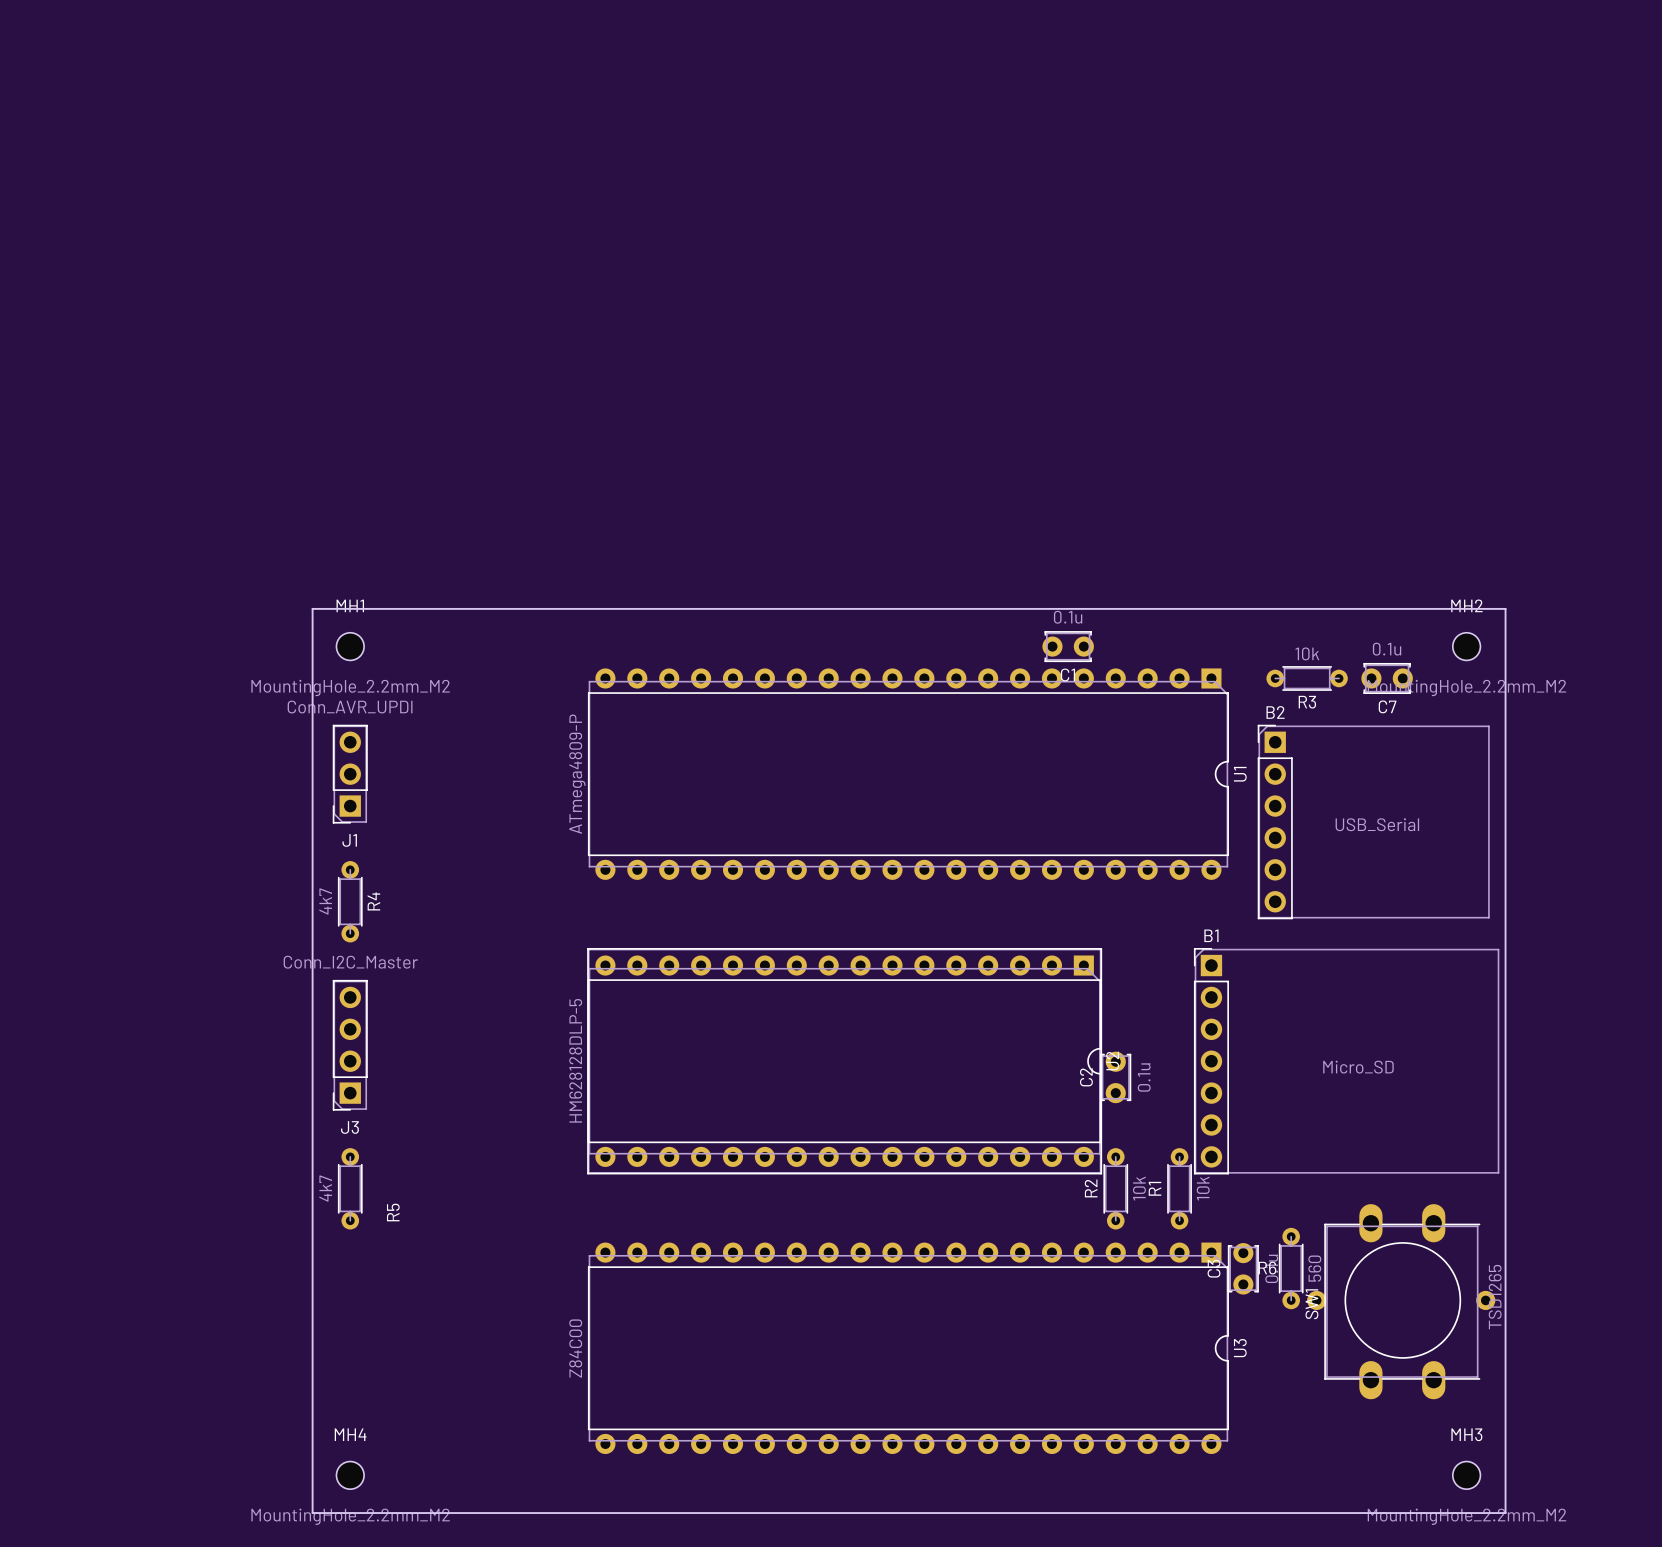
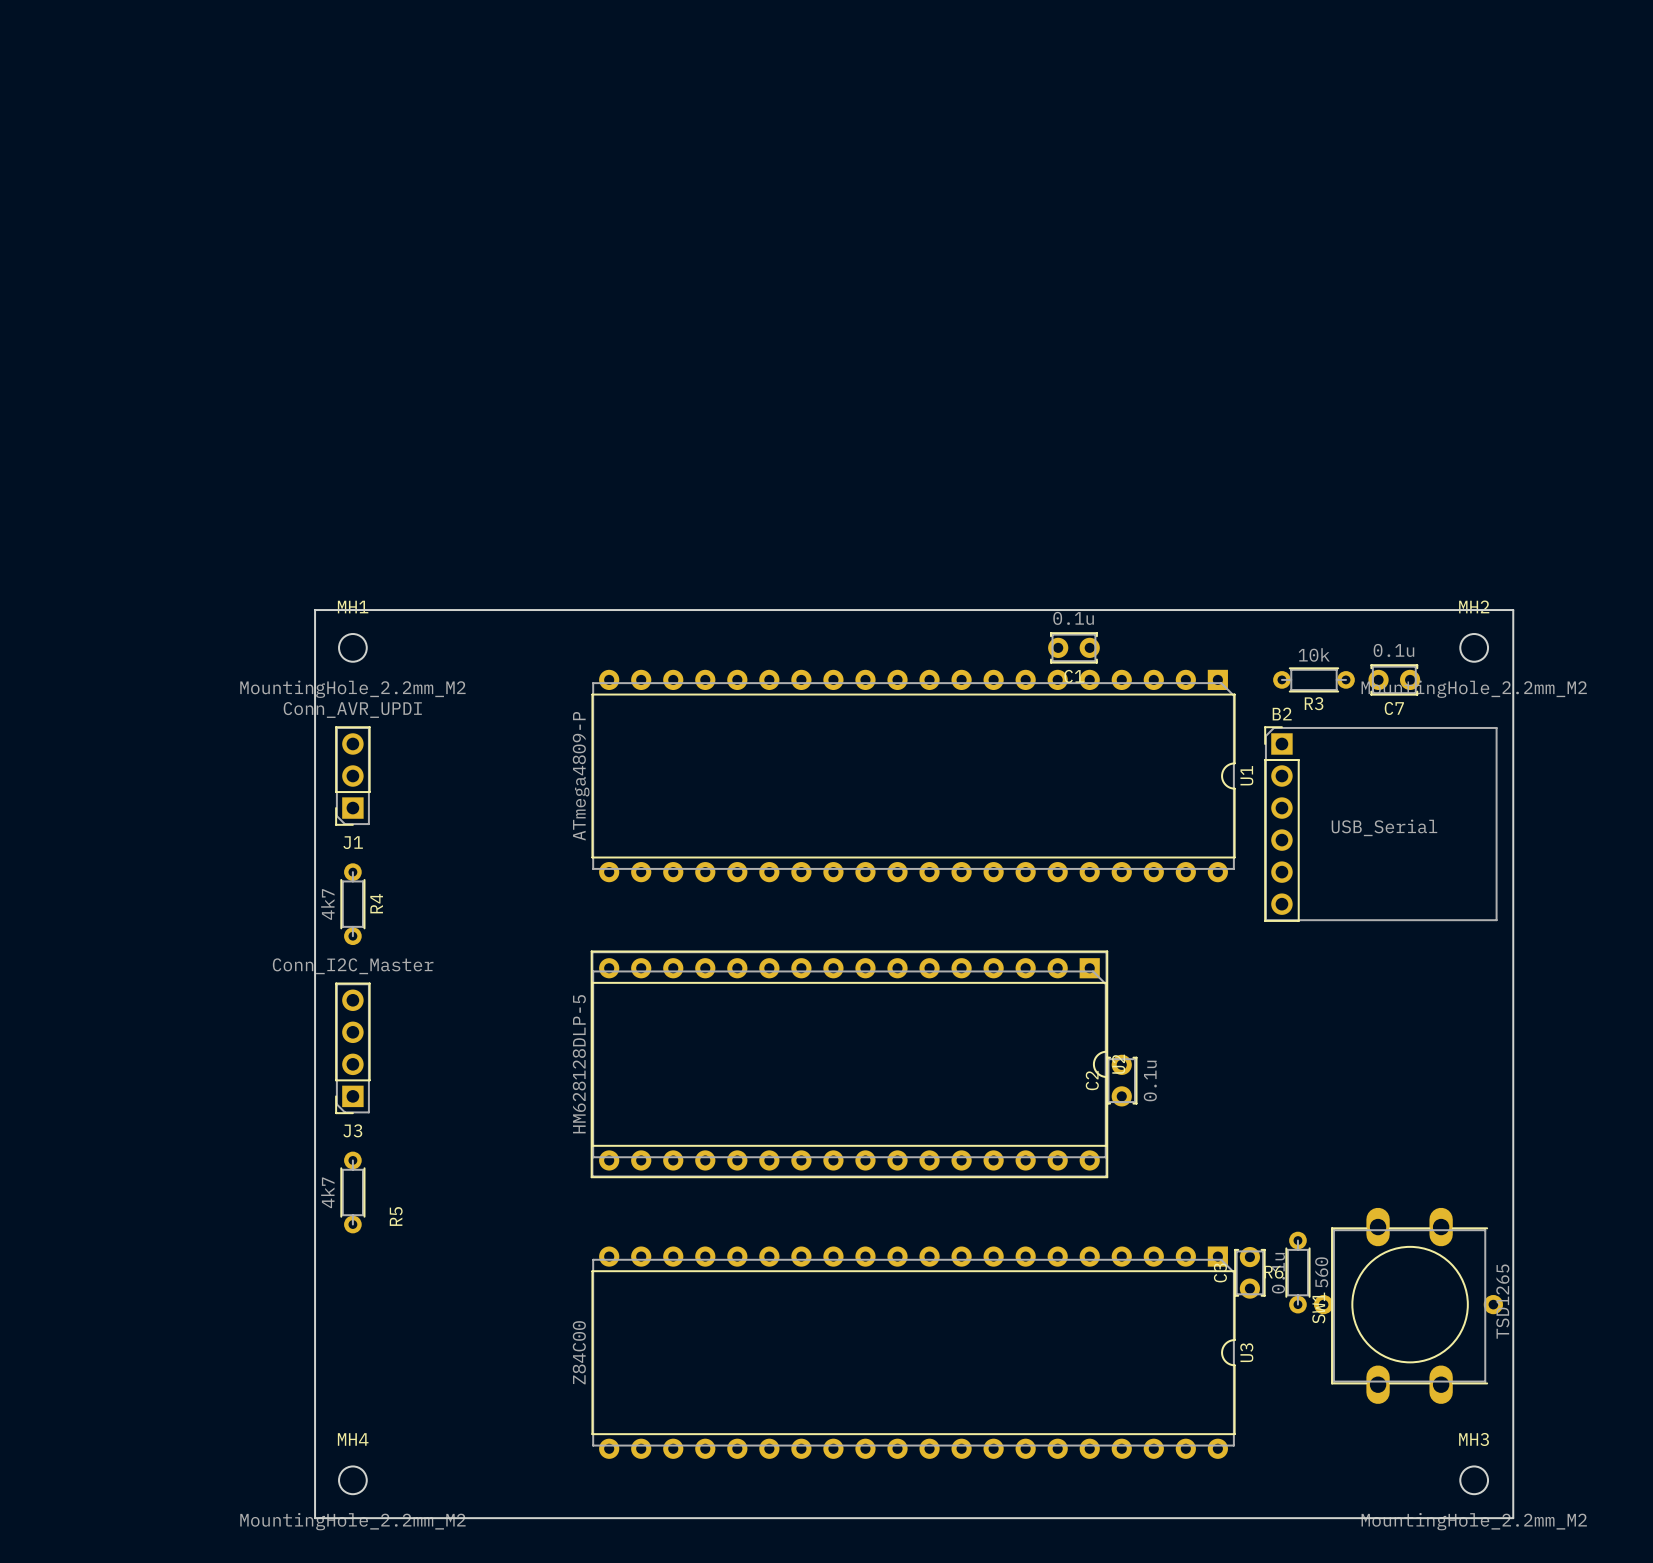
B1: Micro_SD (1346, 1061) -> none
R2: 10k (1115, 1188) -> none
R1: 10k (1179, 1188) -> none

